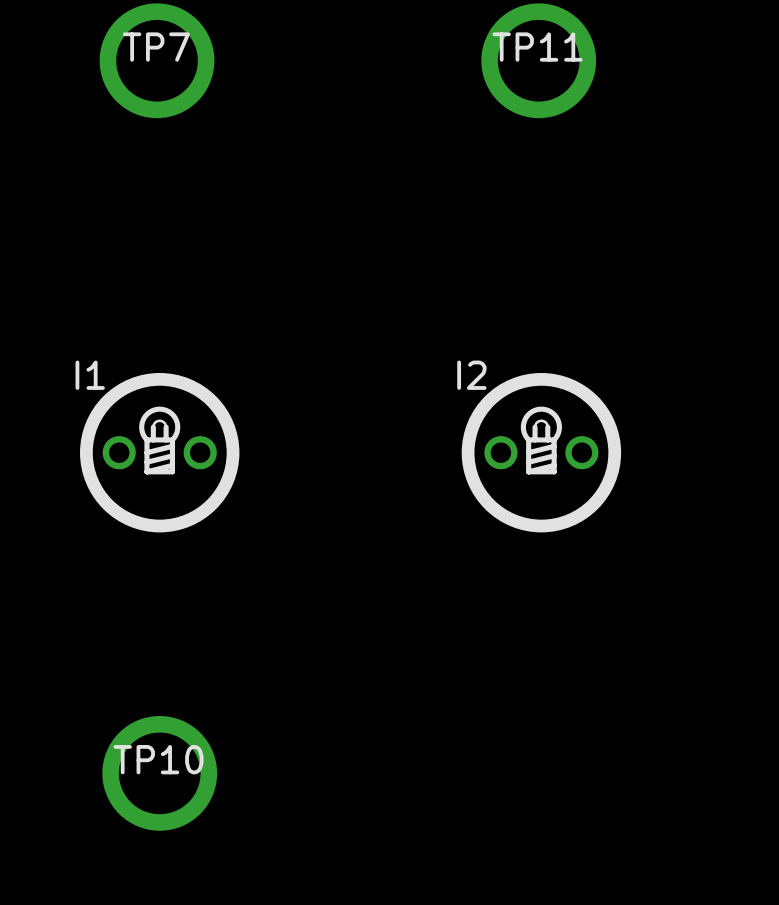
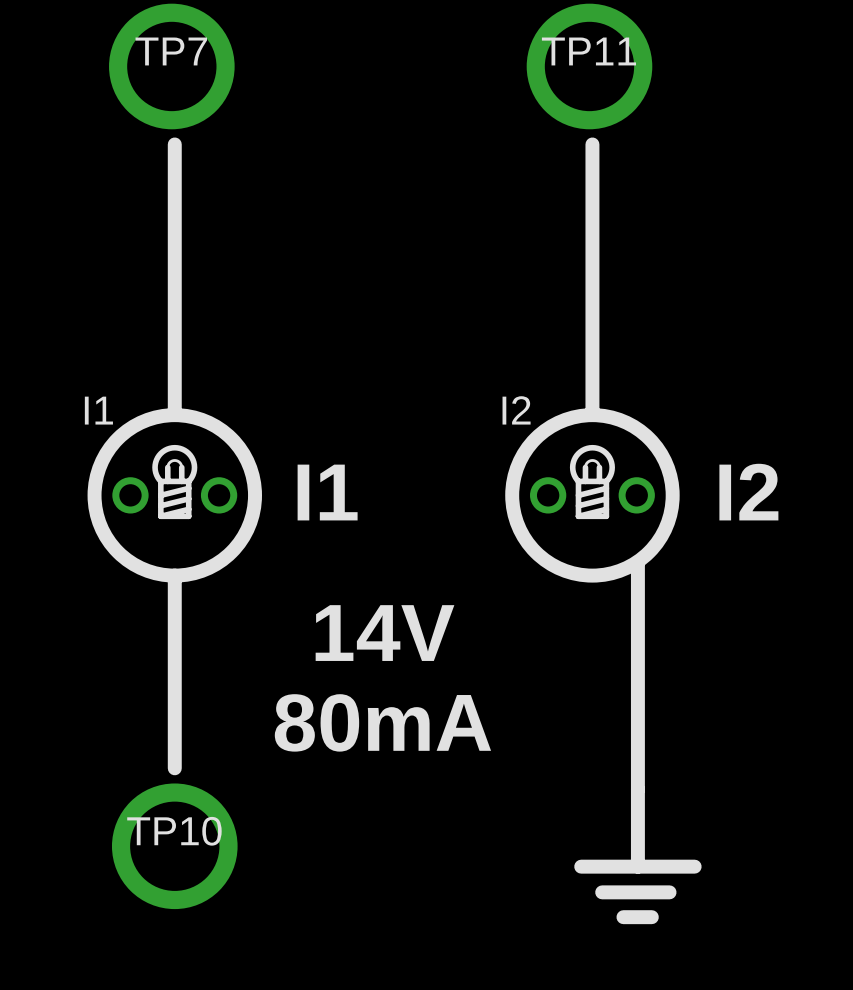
line: none -> (174, 144) (174, 415)
line: none -> (592, 144) (592, 415)
text: none -> I1 (327, 492)
text: none -> I2 (748, 492)
line: none -> (637, 562) (637, 866)
line: none -> (174, 575) (174, 768)
text: none -> 14V (385, 633)
text: none -> 80mA (382, 722)
line: none -> (581, 866) (694, 866)
line: none -> (602, 892) (669, 892)
line: none -> (623, 917) (651, 917)

